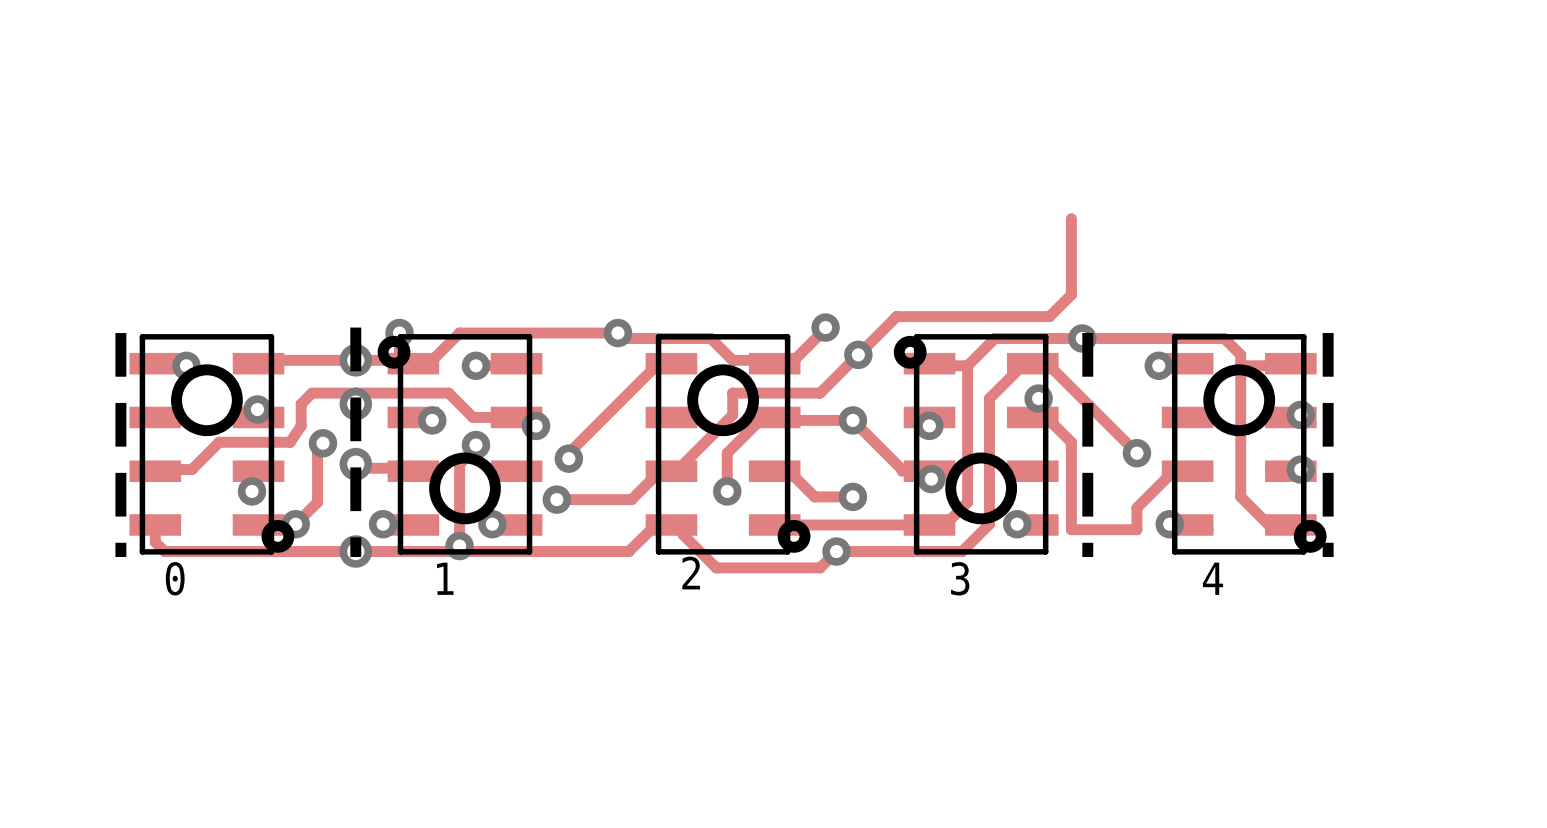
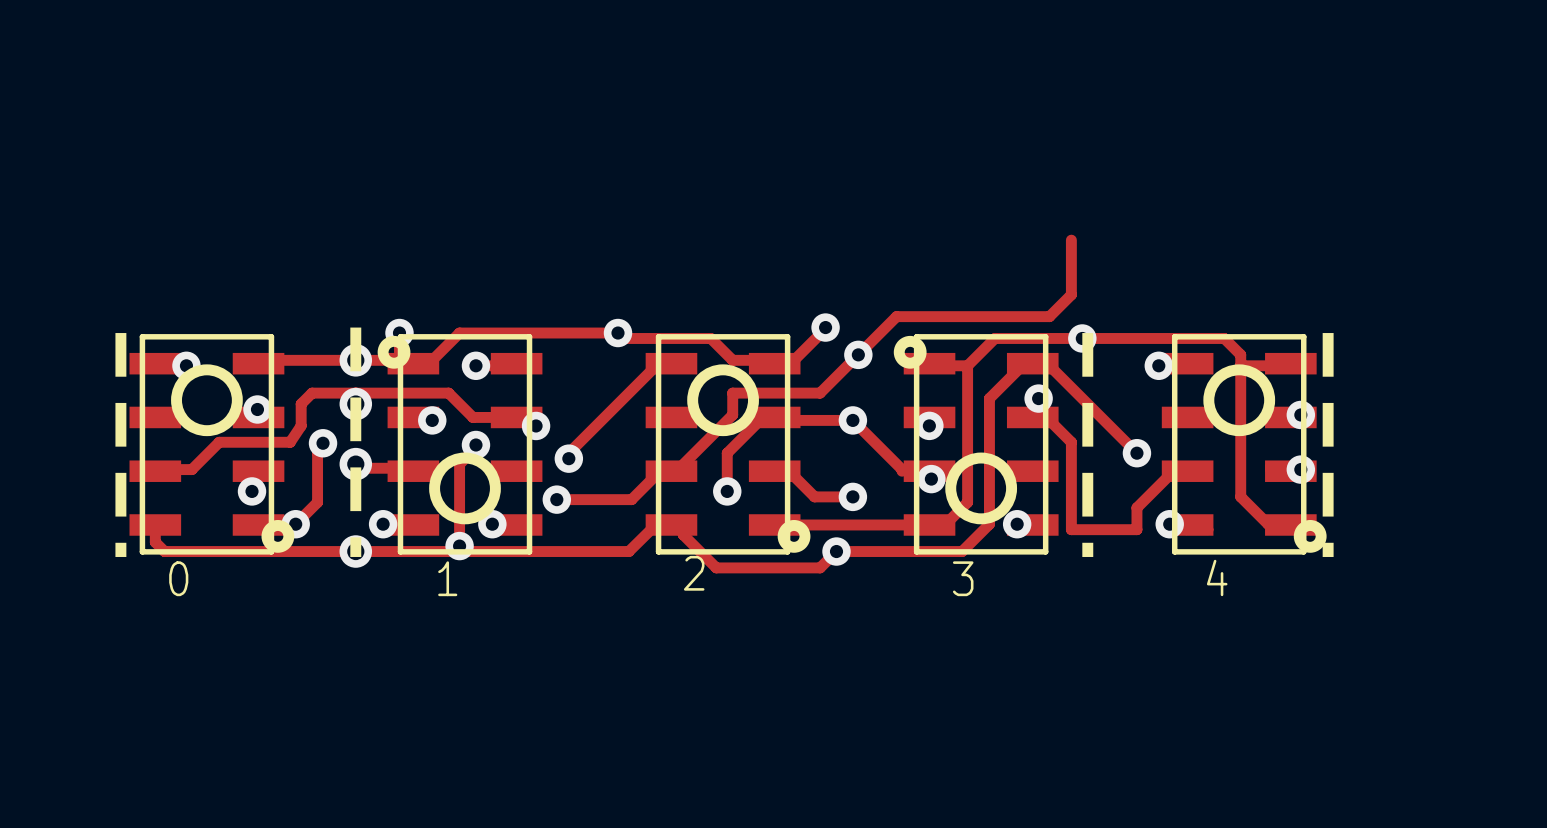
track: (1071, 218) (1071, 240) -> none

